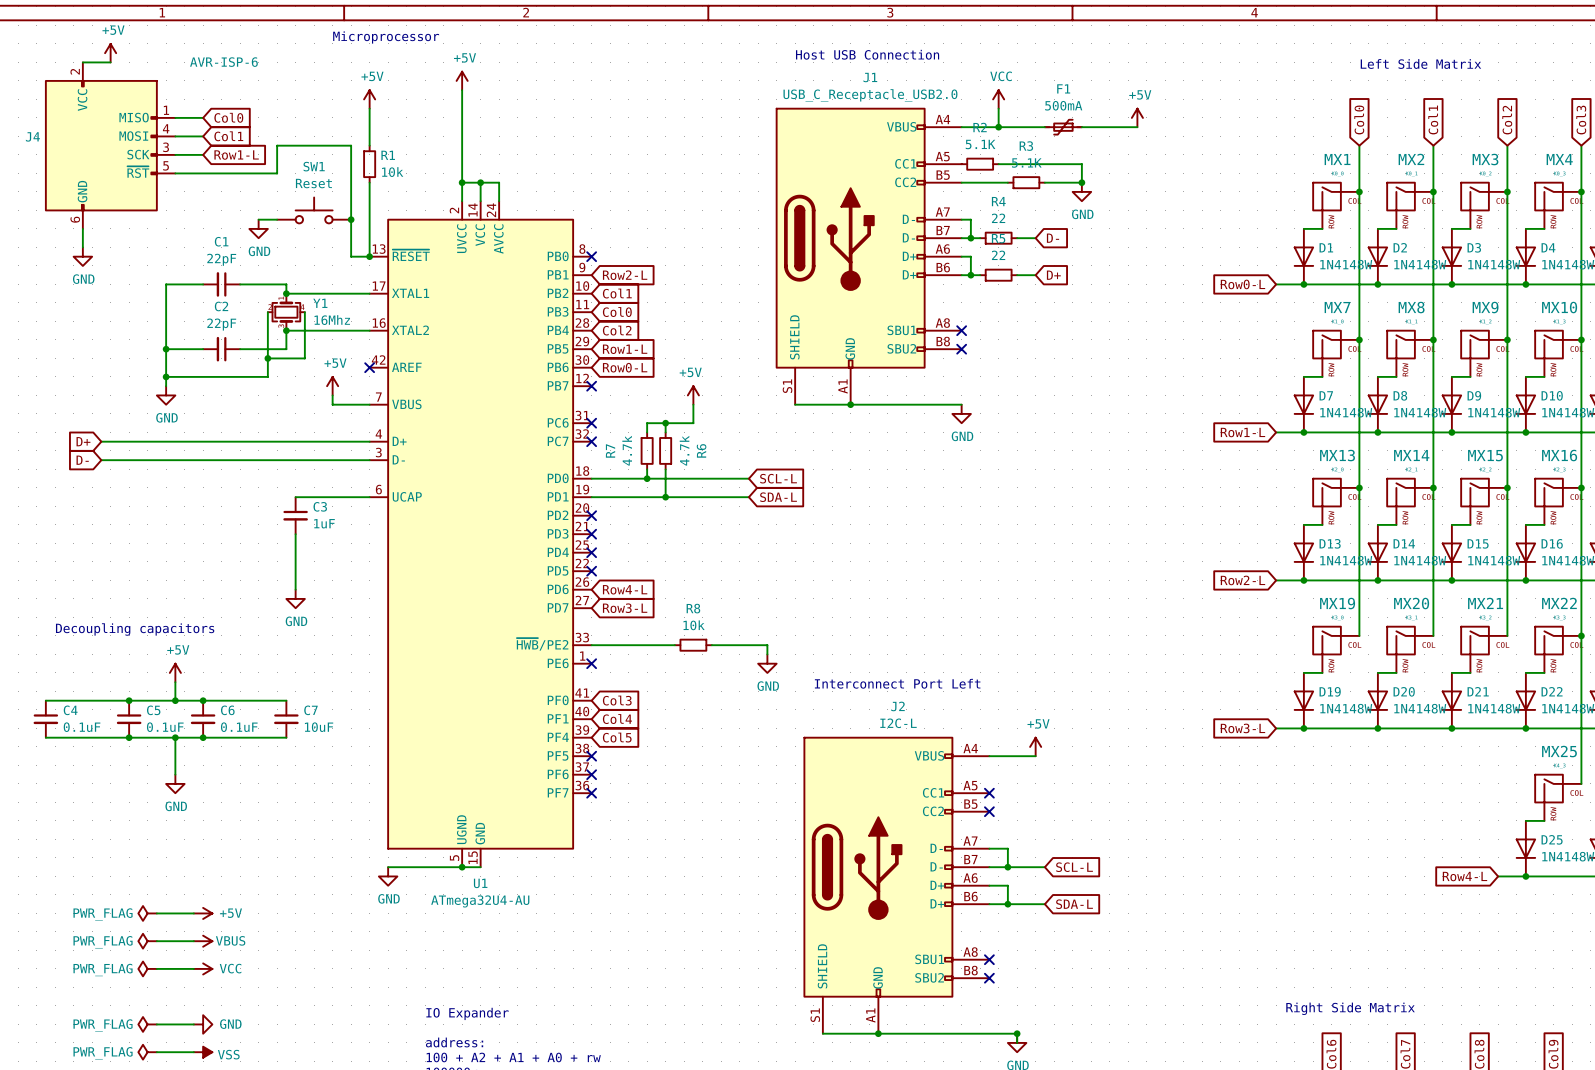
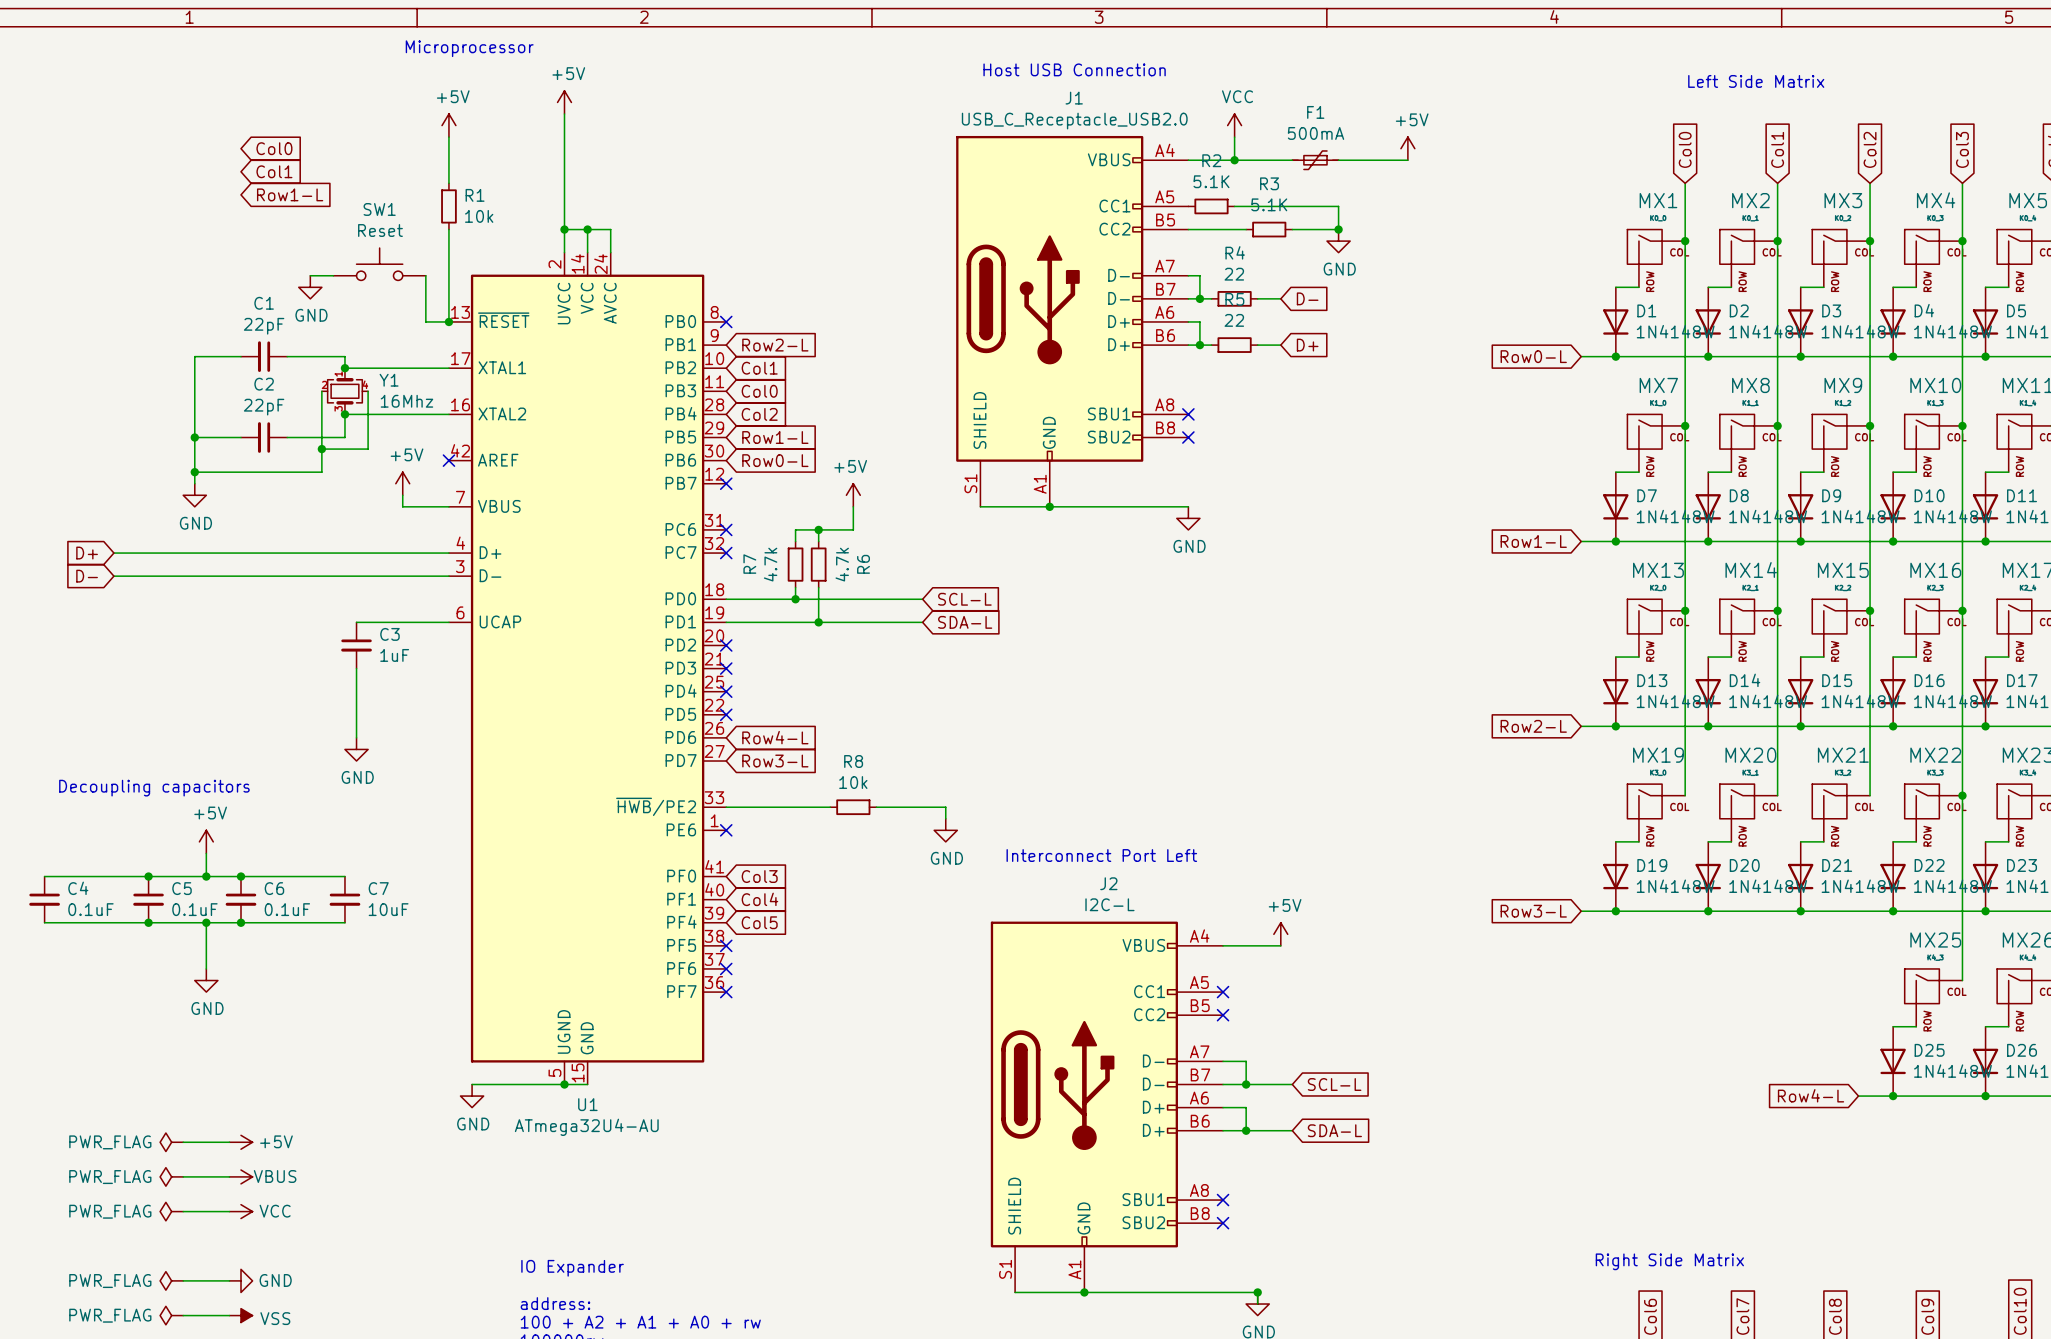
power symbol: +5V (110, 53) -> none
wire: (82, 62) (110, 62) -> none
wire: (175, 117) (203, 117) -> none
wire: (175, 136) (203, 136) -> none
J4: AVR-ISP-6 (110, 145) -> none
wire: (175, 154) (203, 154) -> none
wire: (175, 173) (277, 173) (277, 145) (351, 145) (351, 219) -> none
junction: (351, 219) -> none
wire: (82, 228) (82, 247) -> none
power symbol: GND (82, 256) -> none

